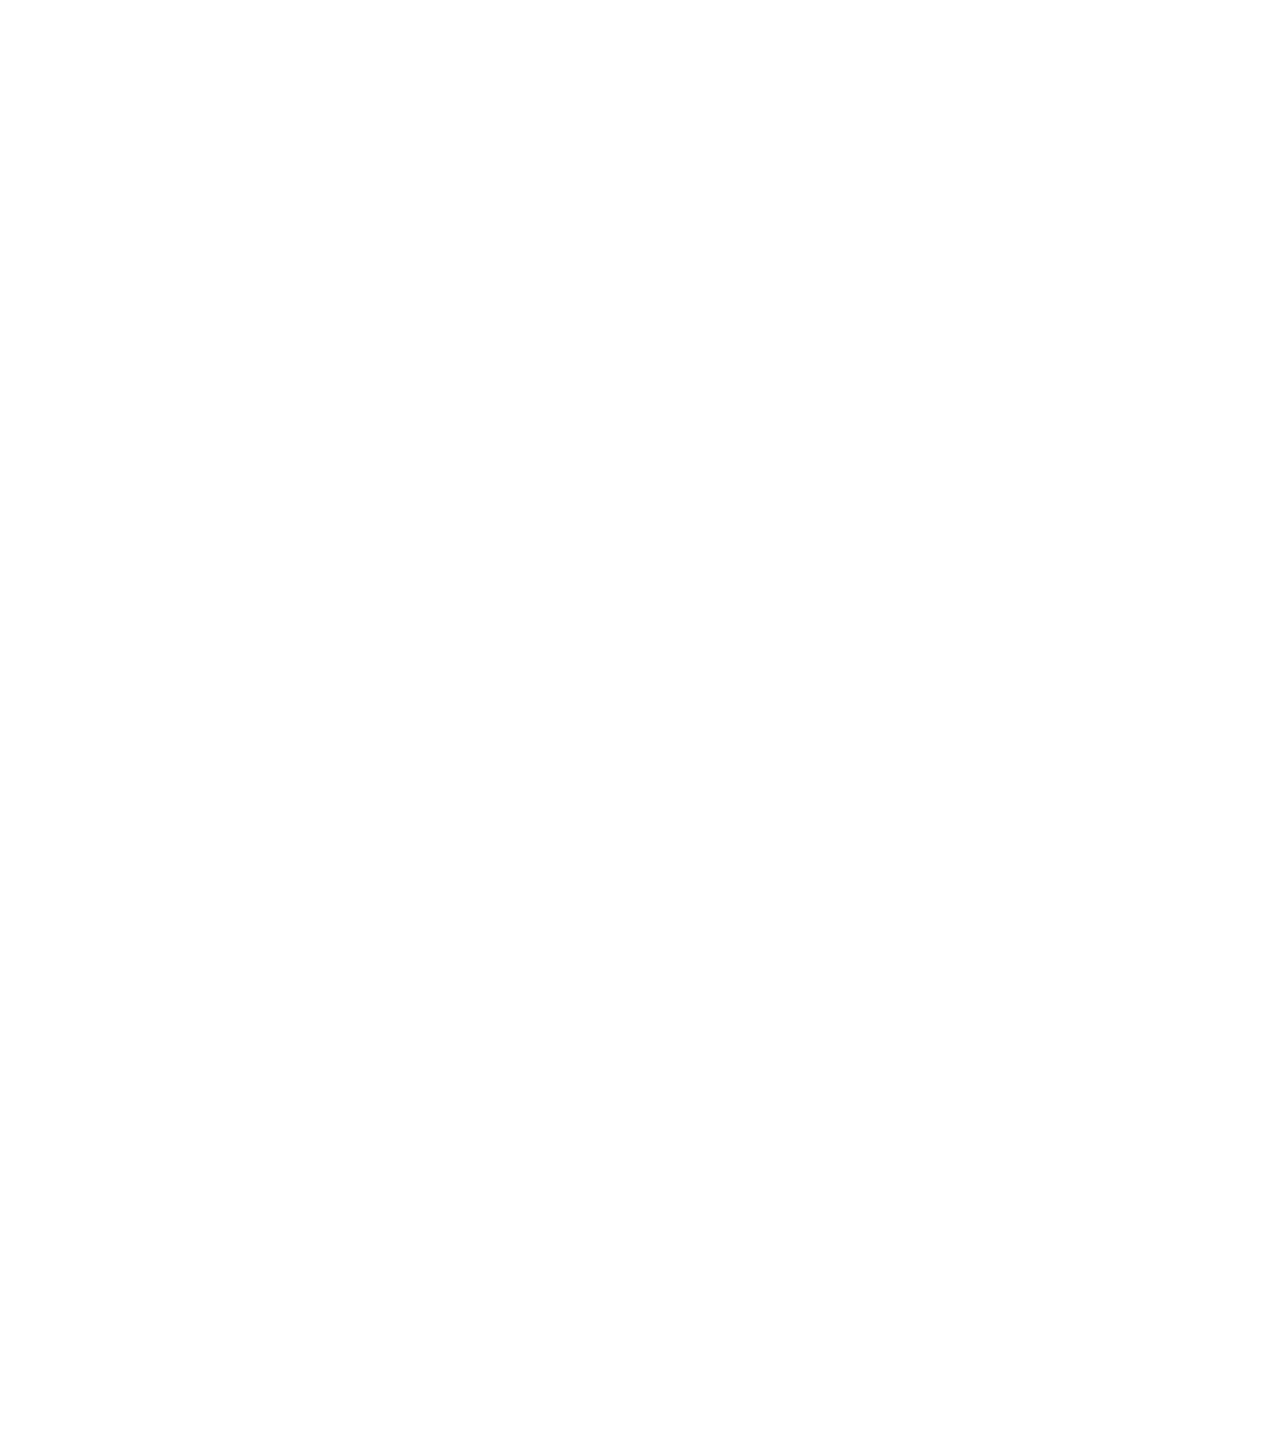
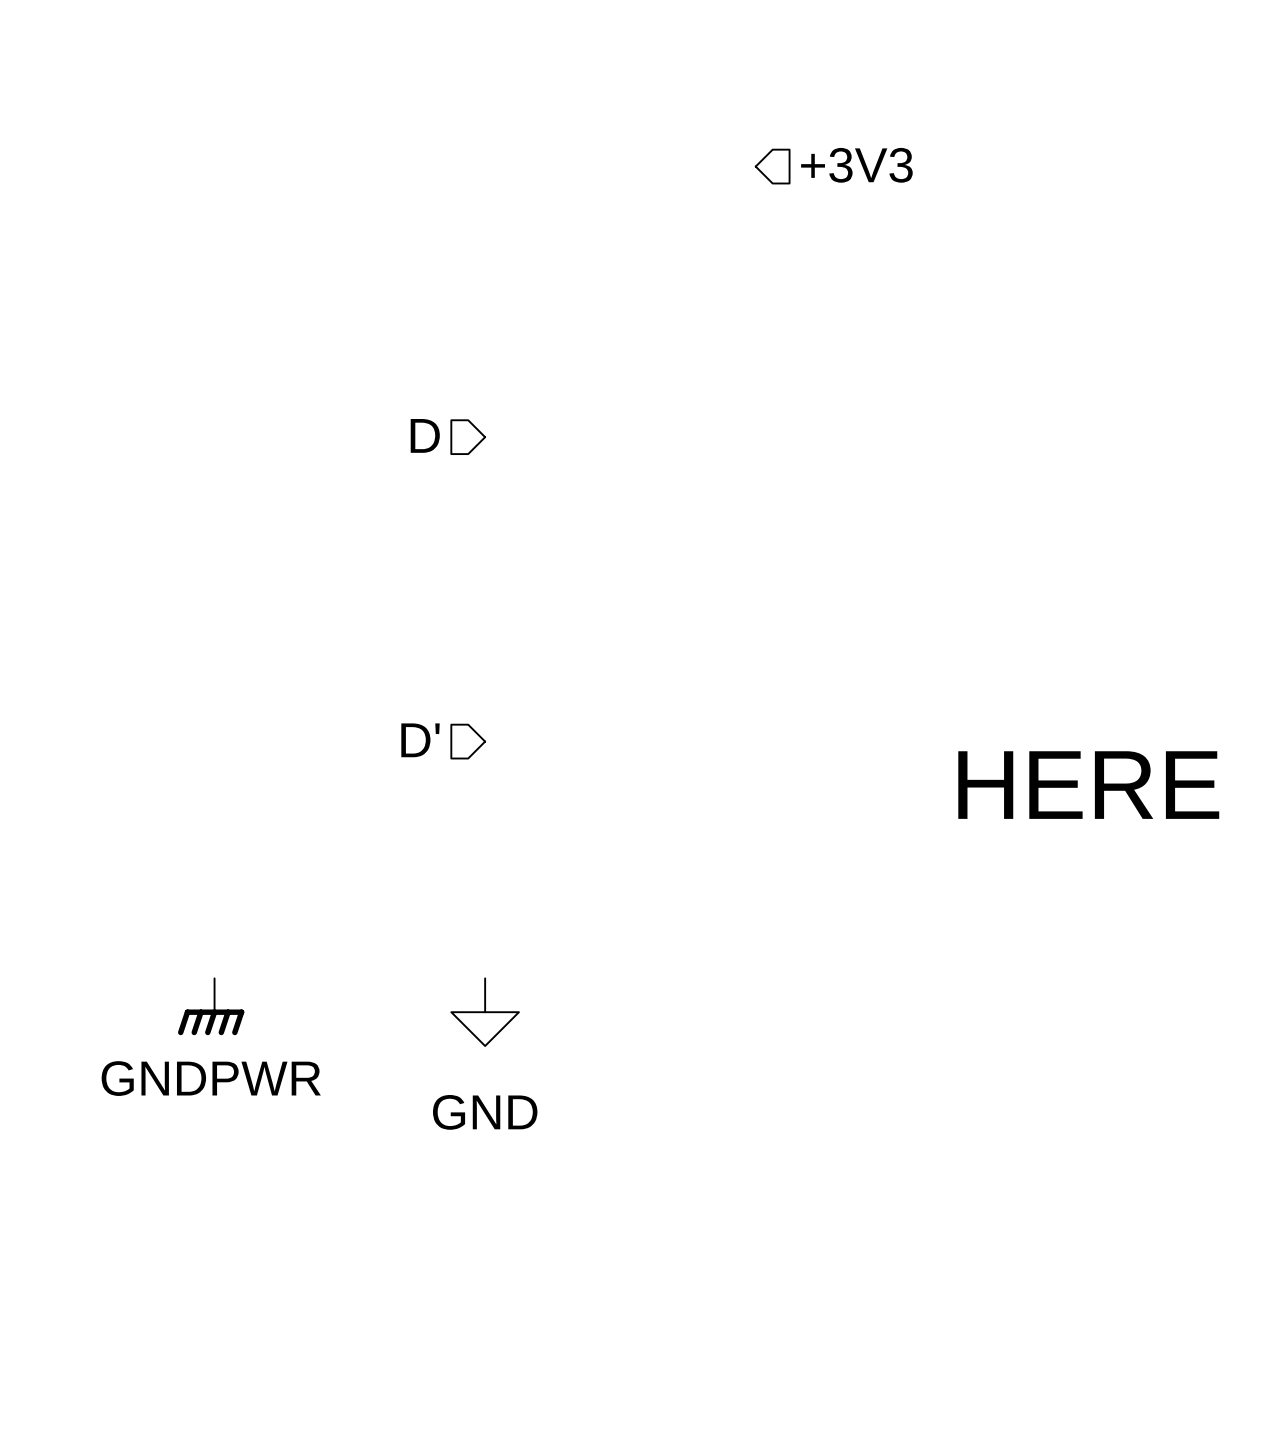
hierarchical label: none -> +3V3 (856, 165)
hierarchical label: none -> D (425, 435)
hierarchical label: none -> D' (420, 740)
text: none -> HERE (1088, 785)
power symbol: none -> GNDPWR (211, 1006)
power symbol: none -> GND (485, 1012)

